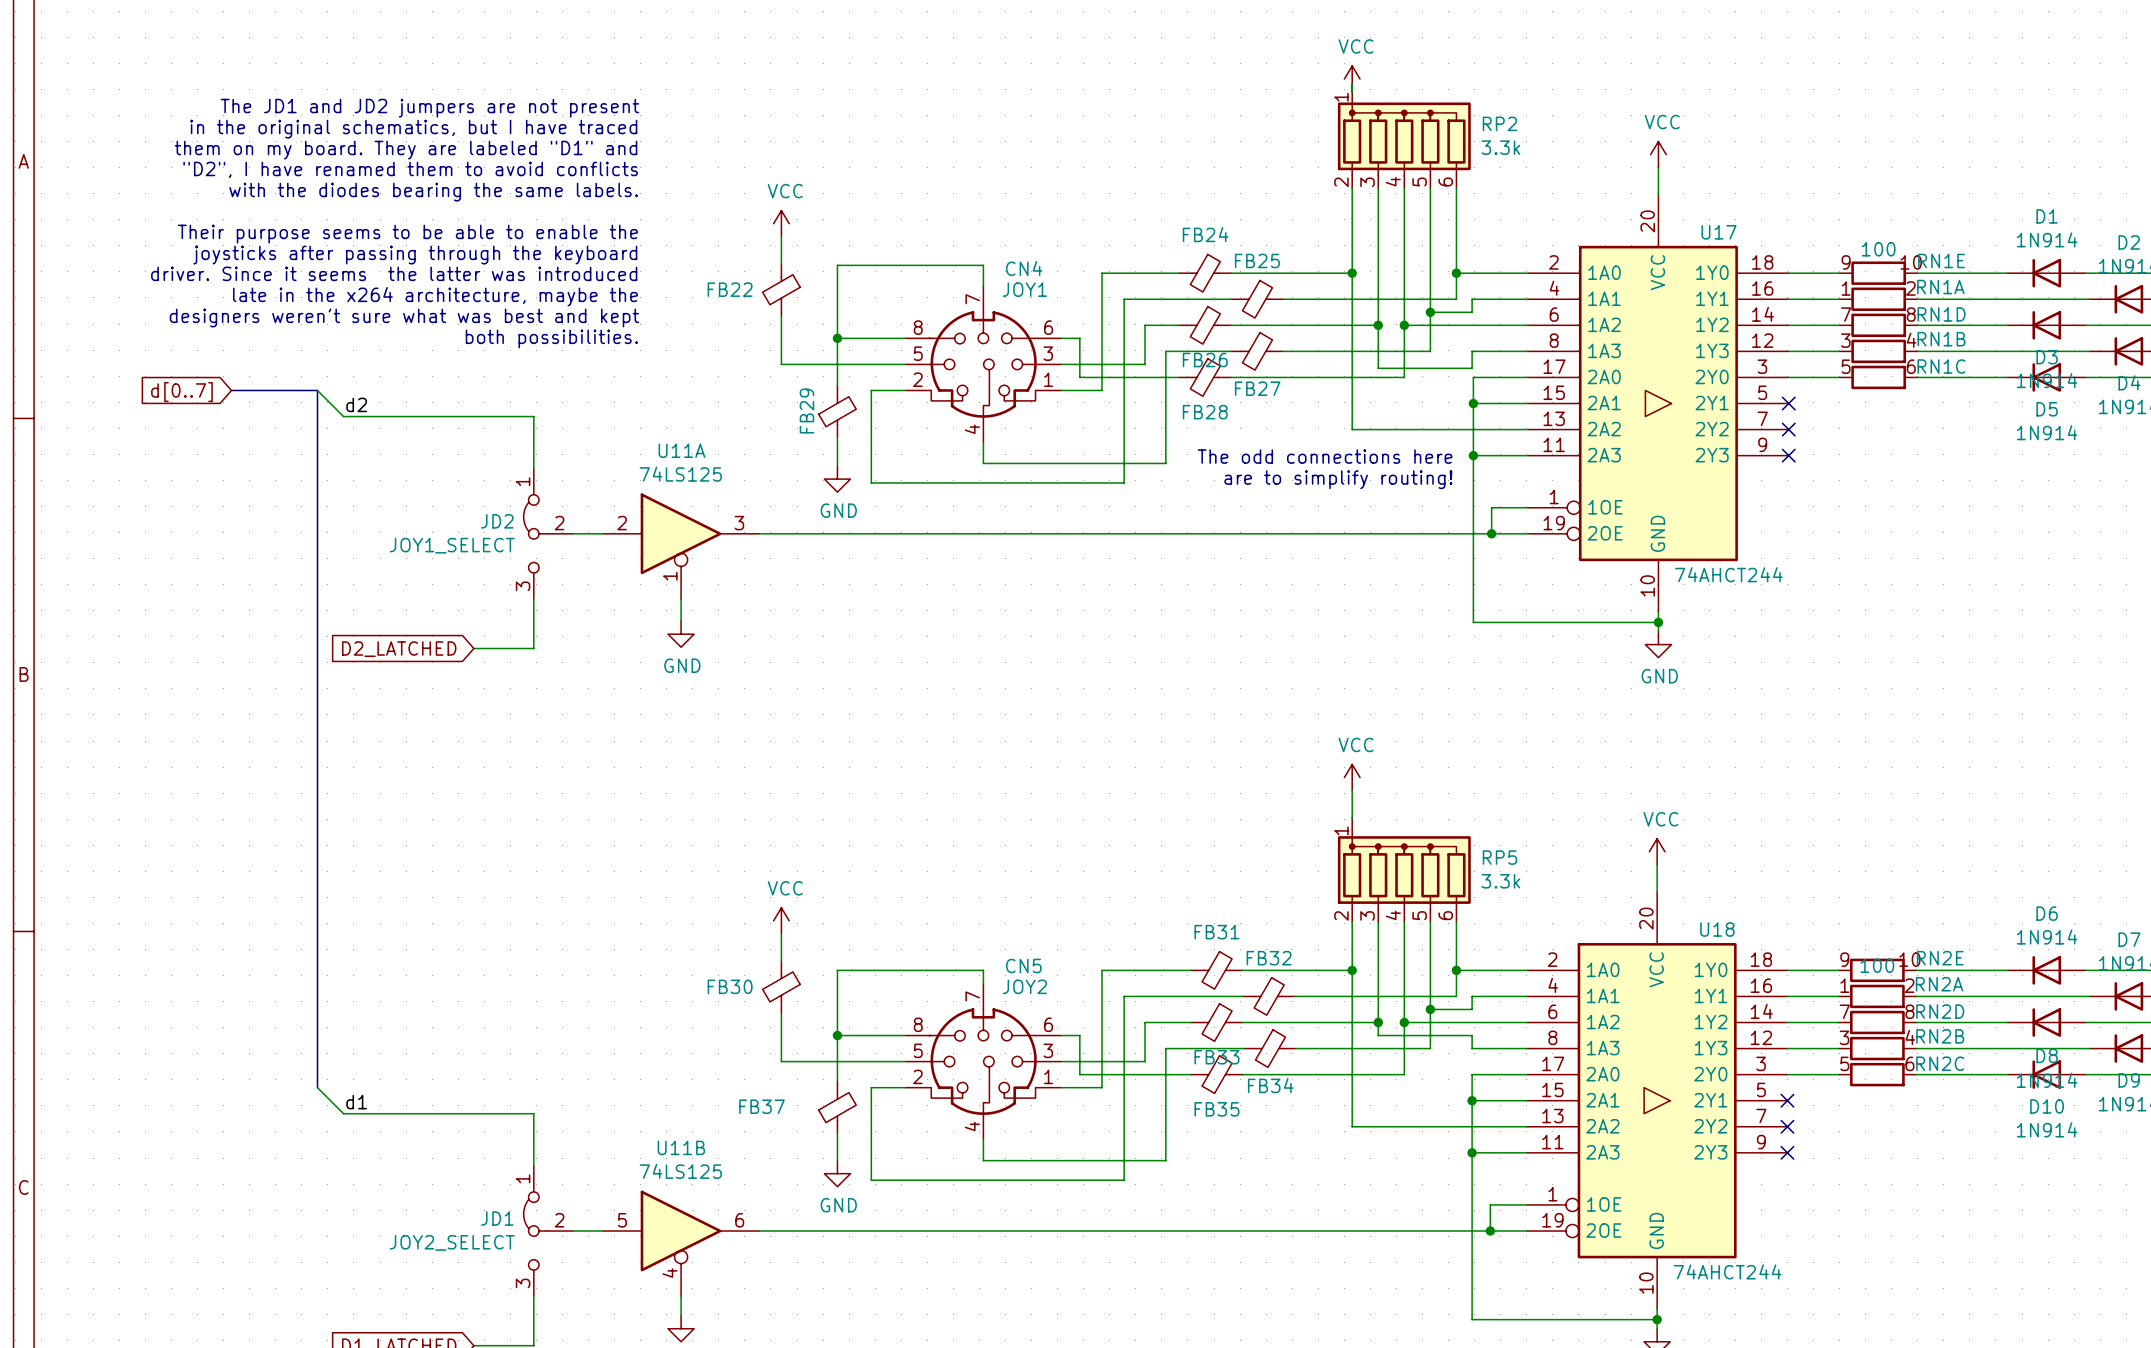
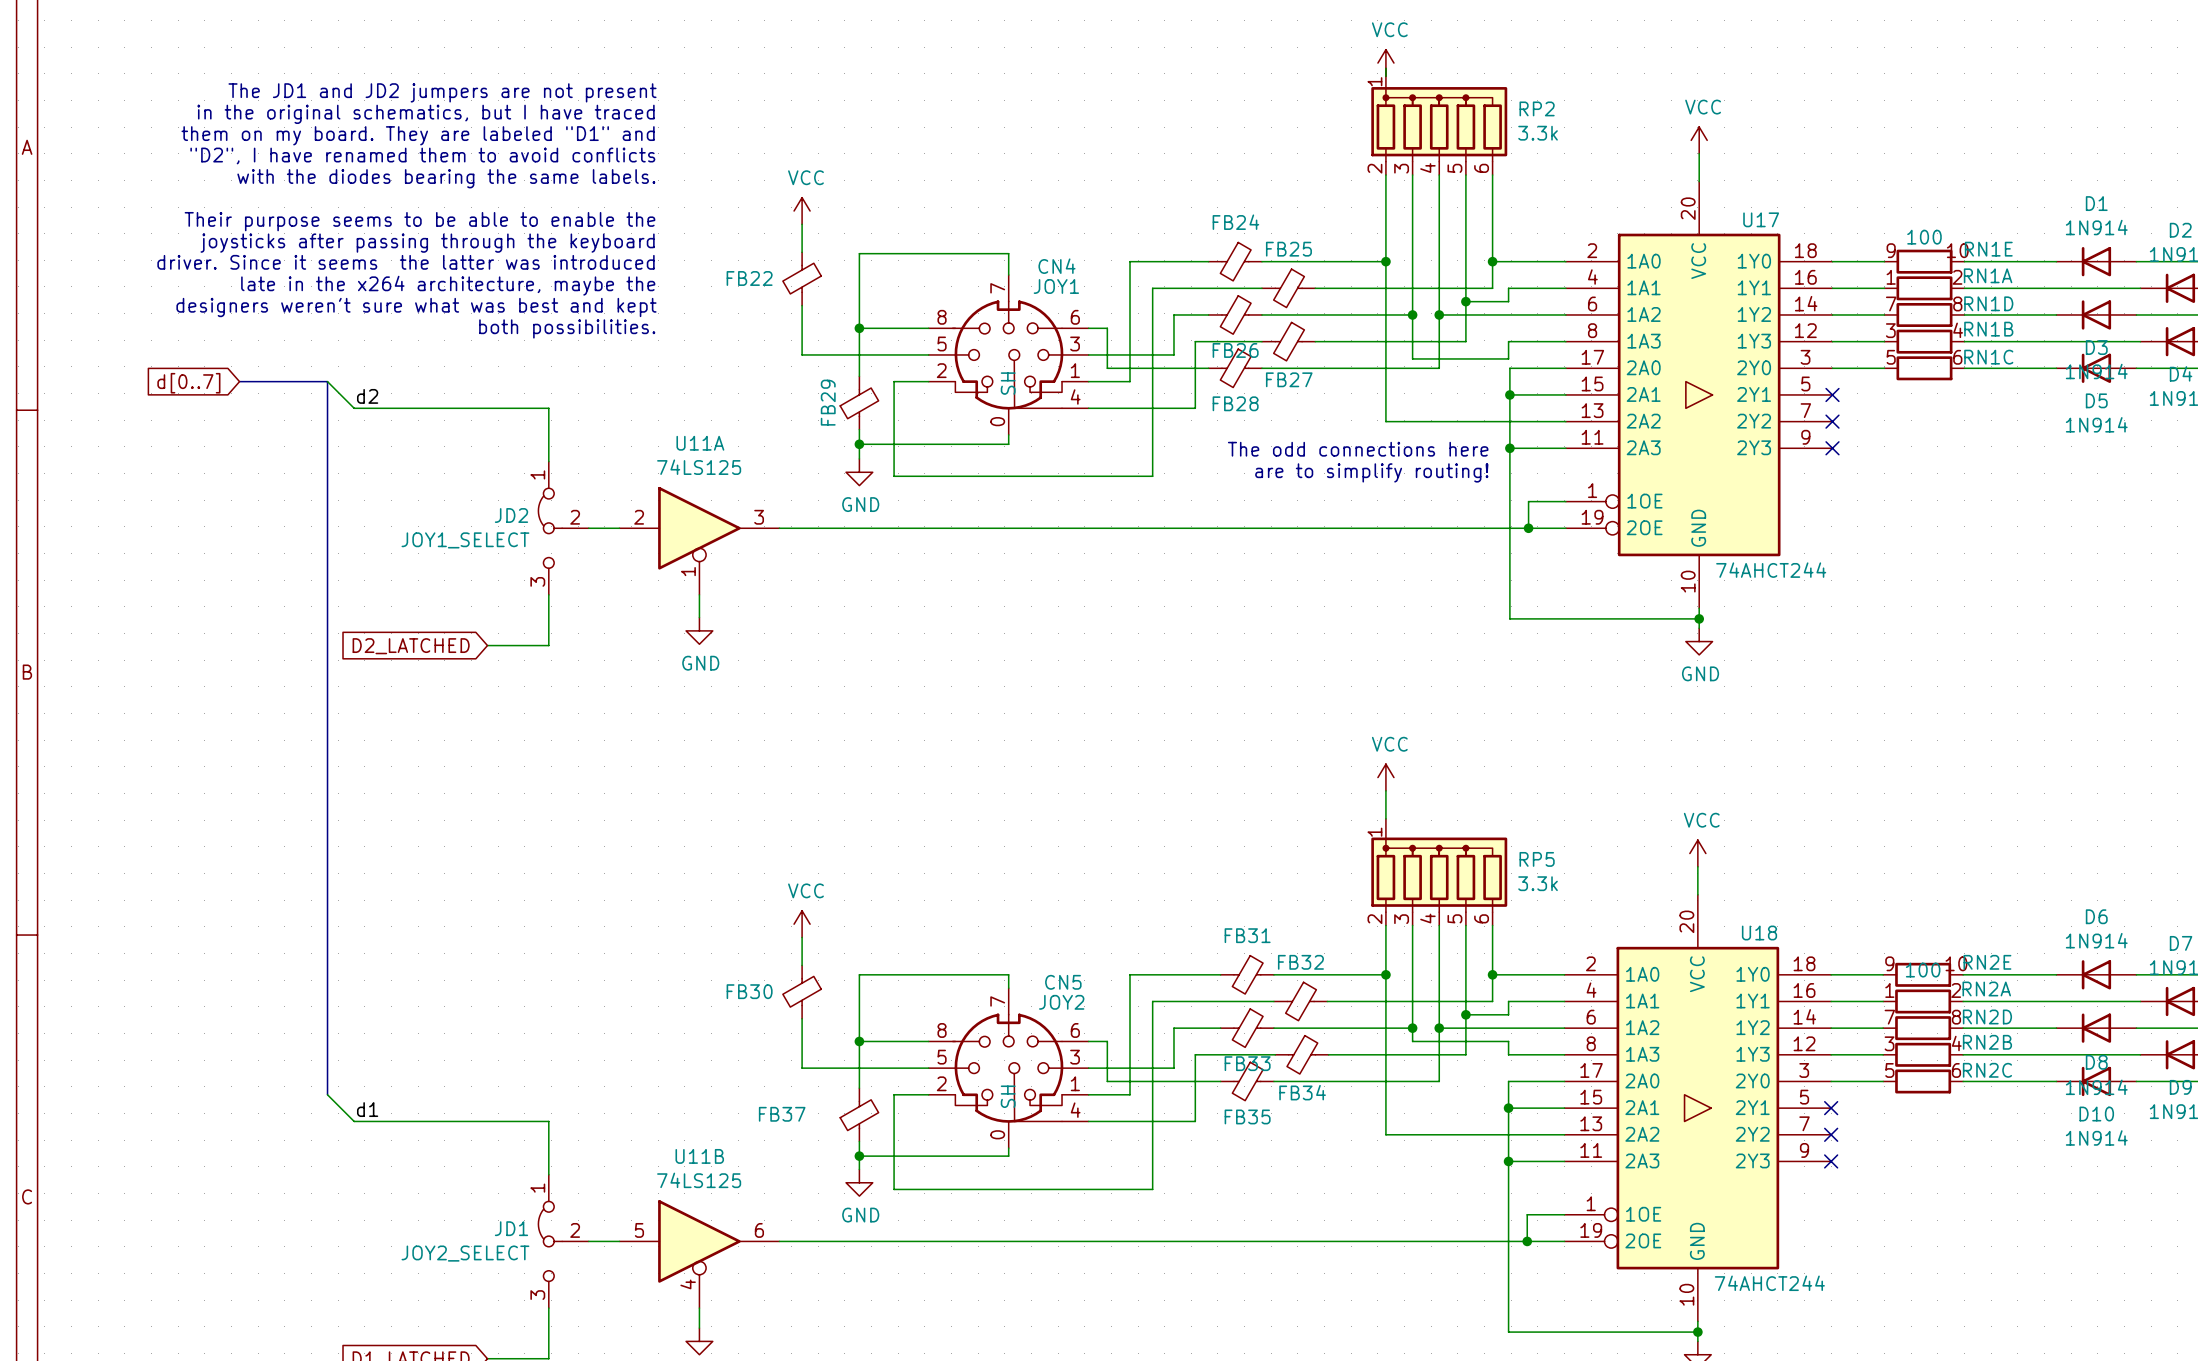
CN4 symbol: [905, 286, 1062, 443] -> [928, 274, 1089, 435]
wire: (1165, 416) (1165, 463) (983, 463) (983, 451) -> (1195, 408) (1088, 408)
wire: none -> (859, 444) (1008, 444)
junction: none -> (859, 444)
CN5 symbol: [905, 983, 1062, 1140] -> [928, 988, 1089, 1149]
wire: (1165, 1113) (1165, 1160) (983, 1160) (983, 1147) -> (1195, 1121) (1088, 1121)
wire: none -> (859, 1156) (1008, 1156)
junction: none -> (859, 1156)

